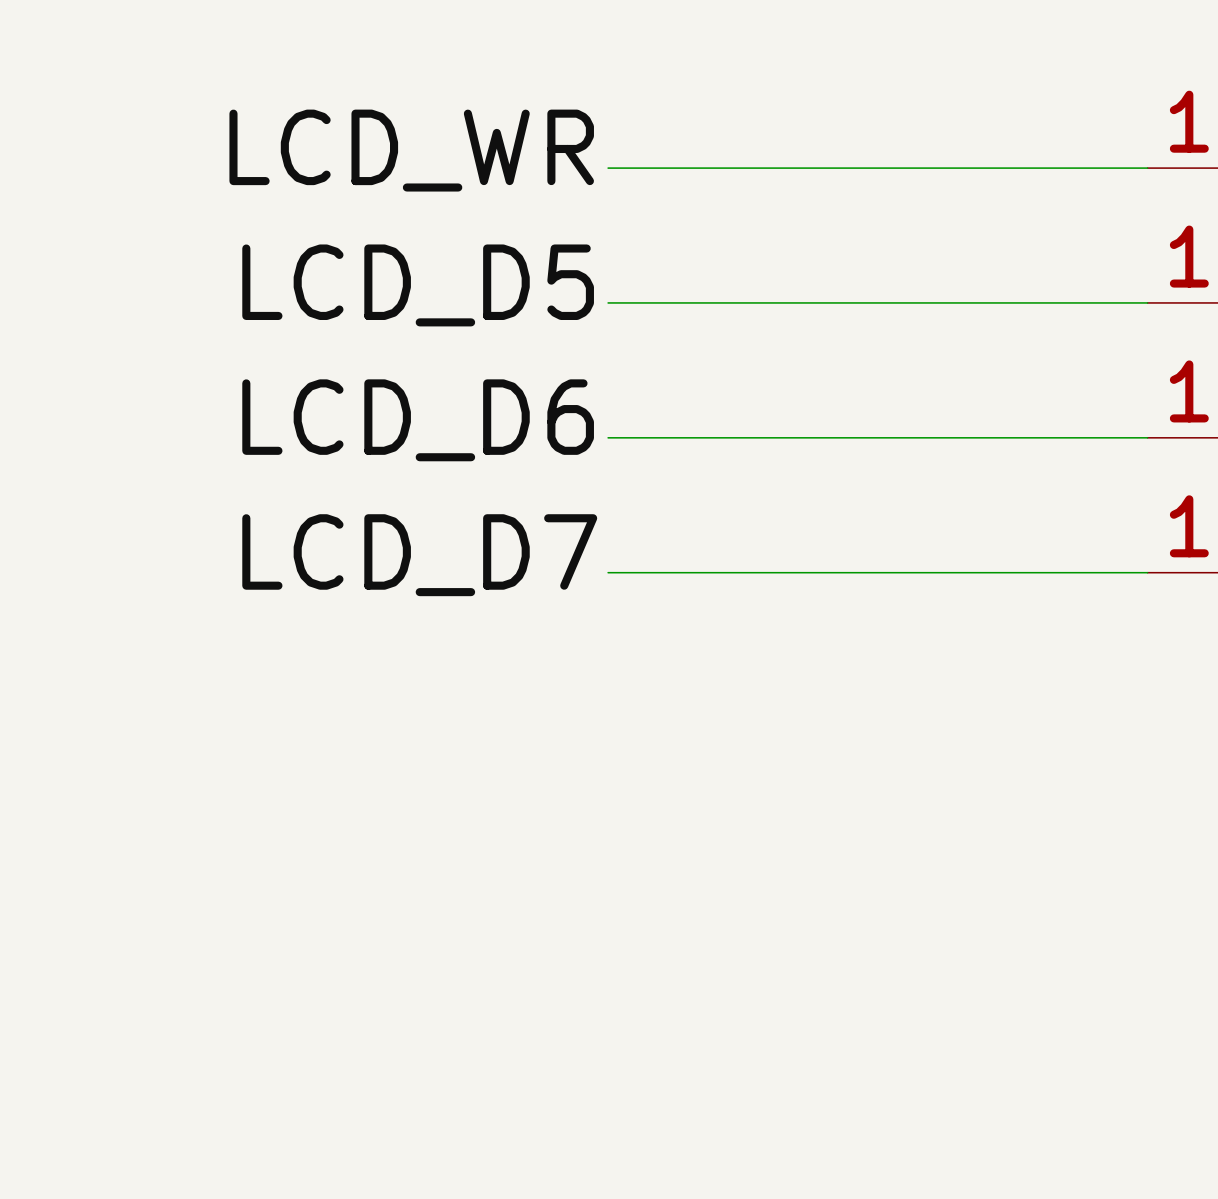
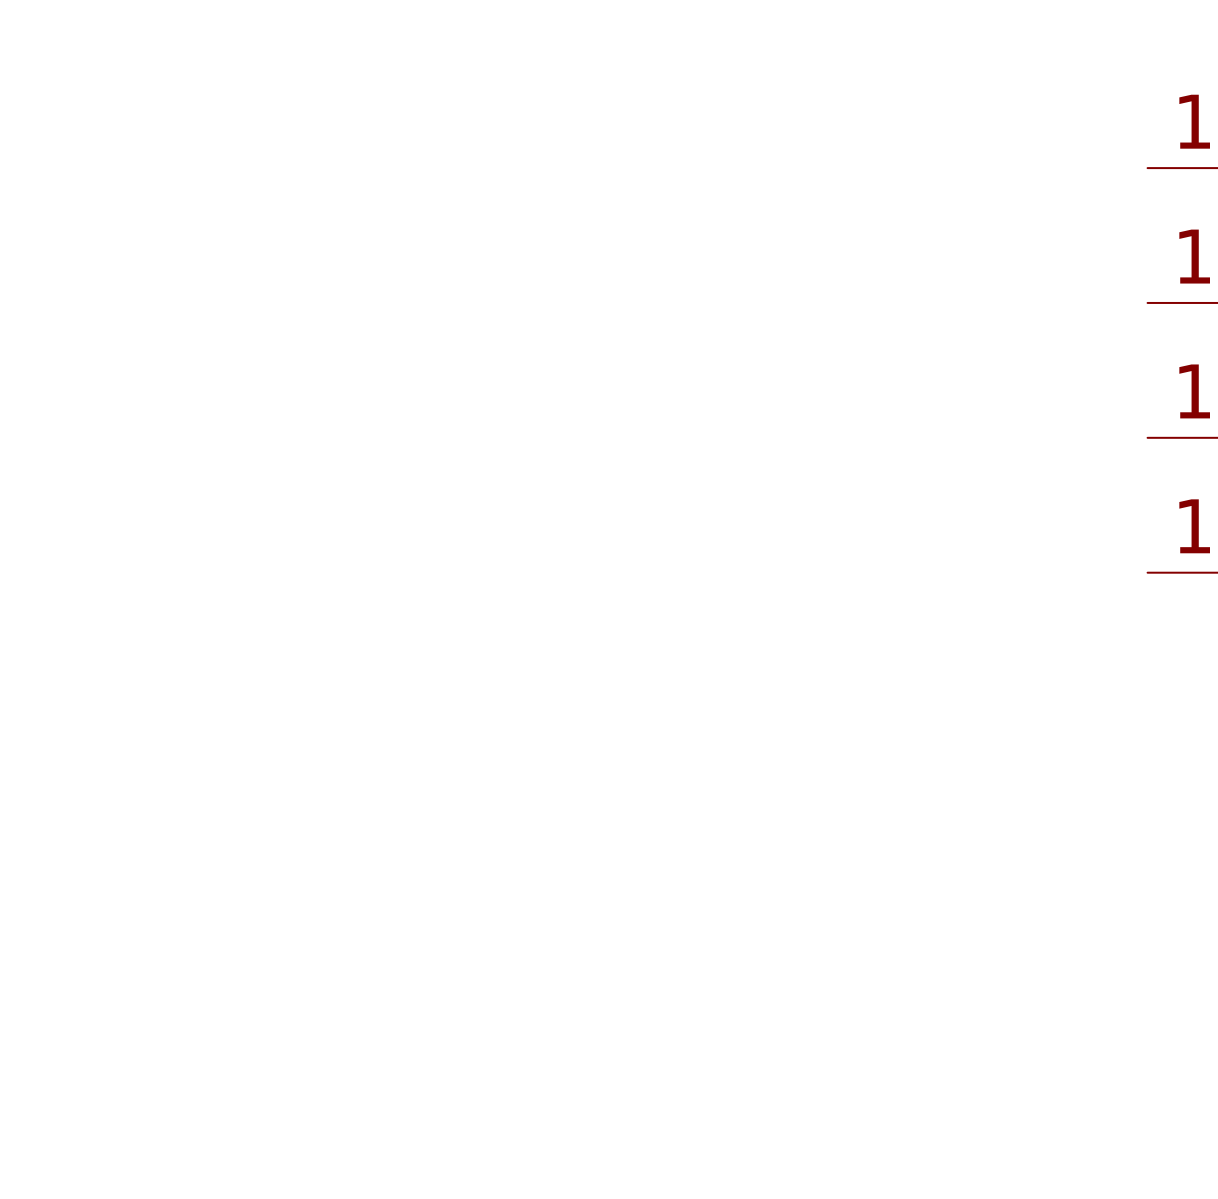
label: LCD_WR (411, 150) -> none
wire: (608, 168) (1147, 168) -> none
label: LCD_D5 (418, 285) -> none
wire: (608, 302) (1147, 302) -> none
label: LCD_D6 (418, 420) -> none
wire: (608, 437) (1147, 437) -> none
label: LCD_D7 (419, 555) -> none
wire: (608, 572) (1147, 572) -> none

